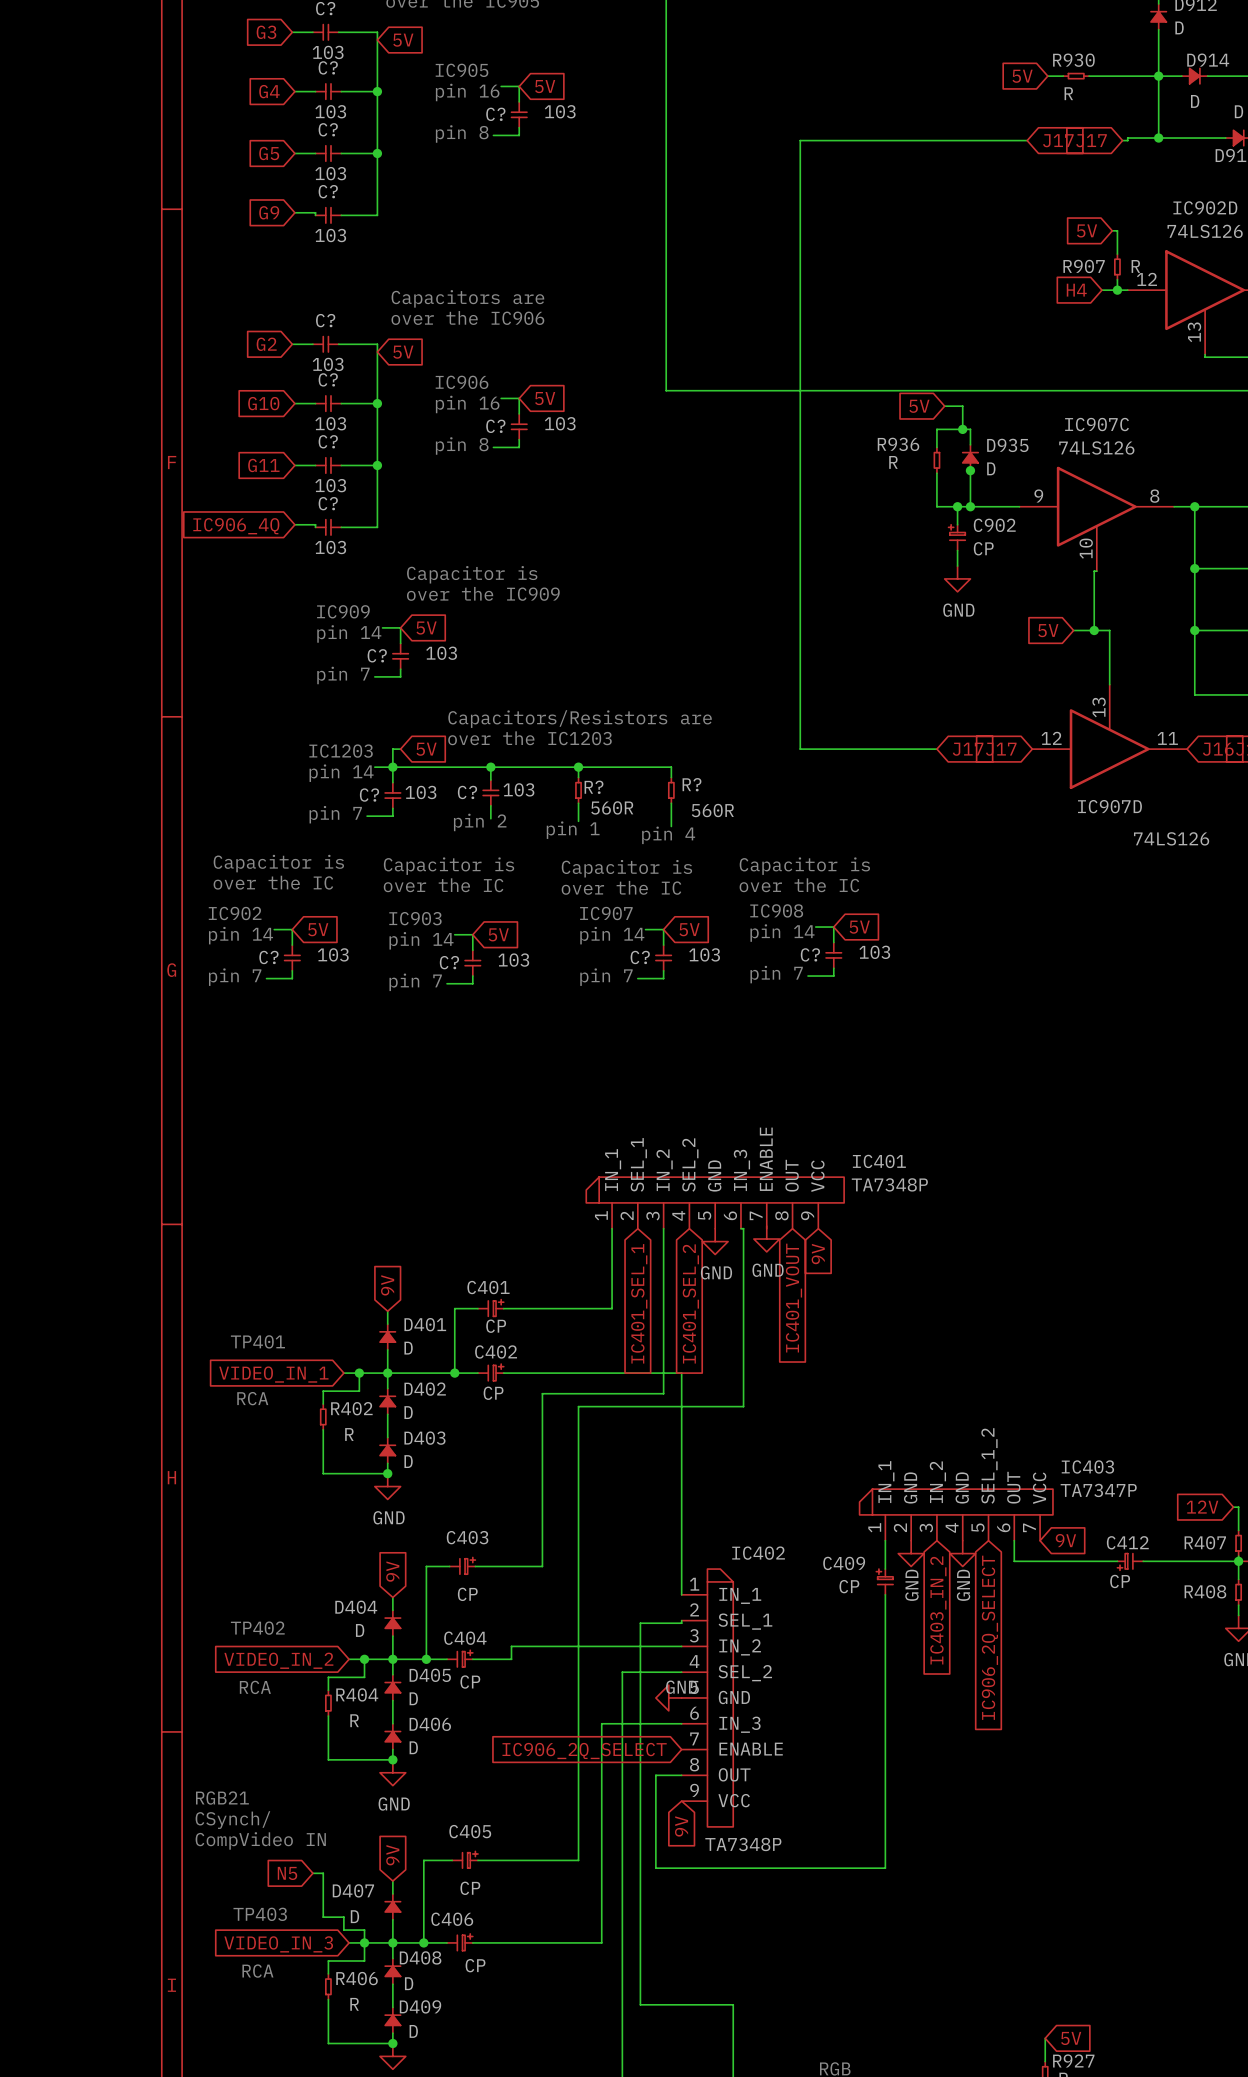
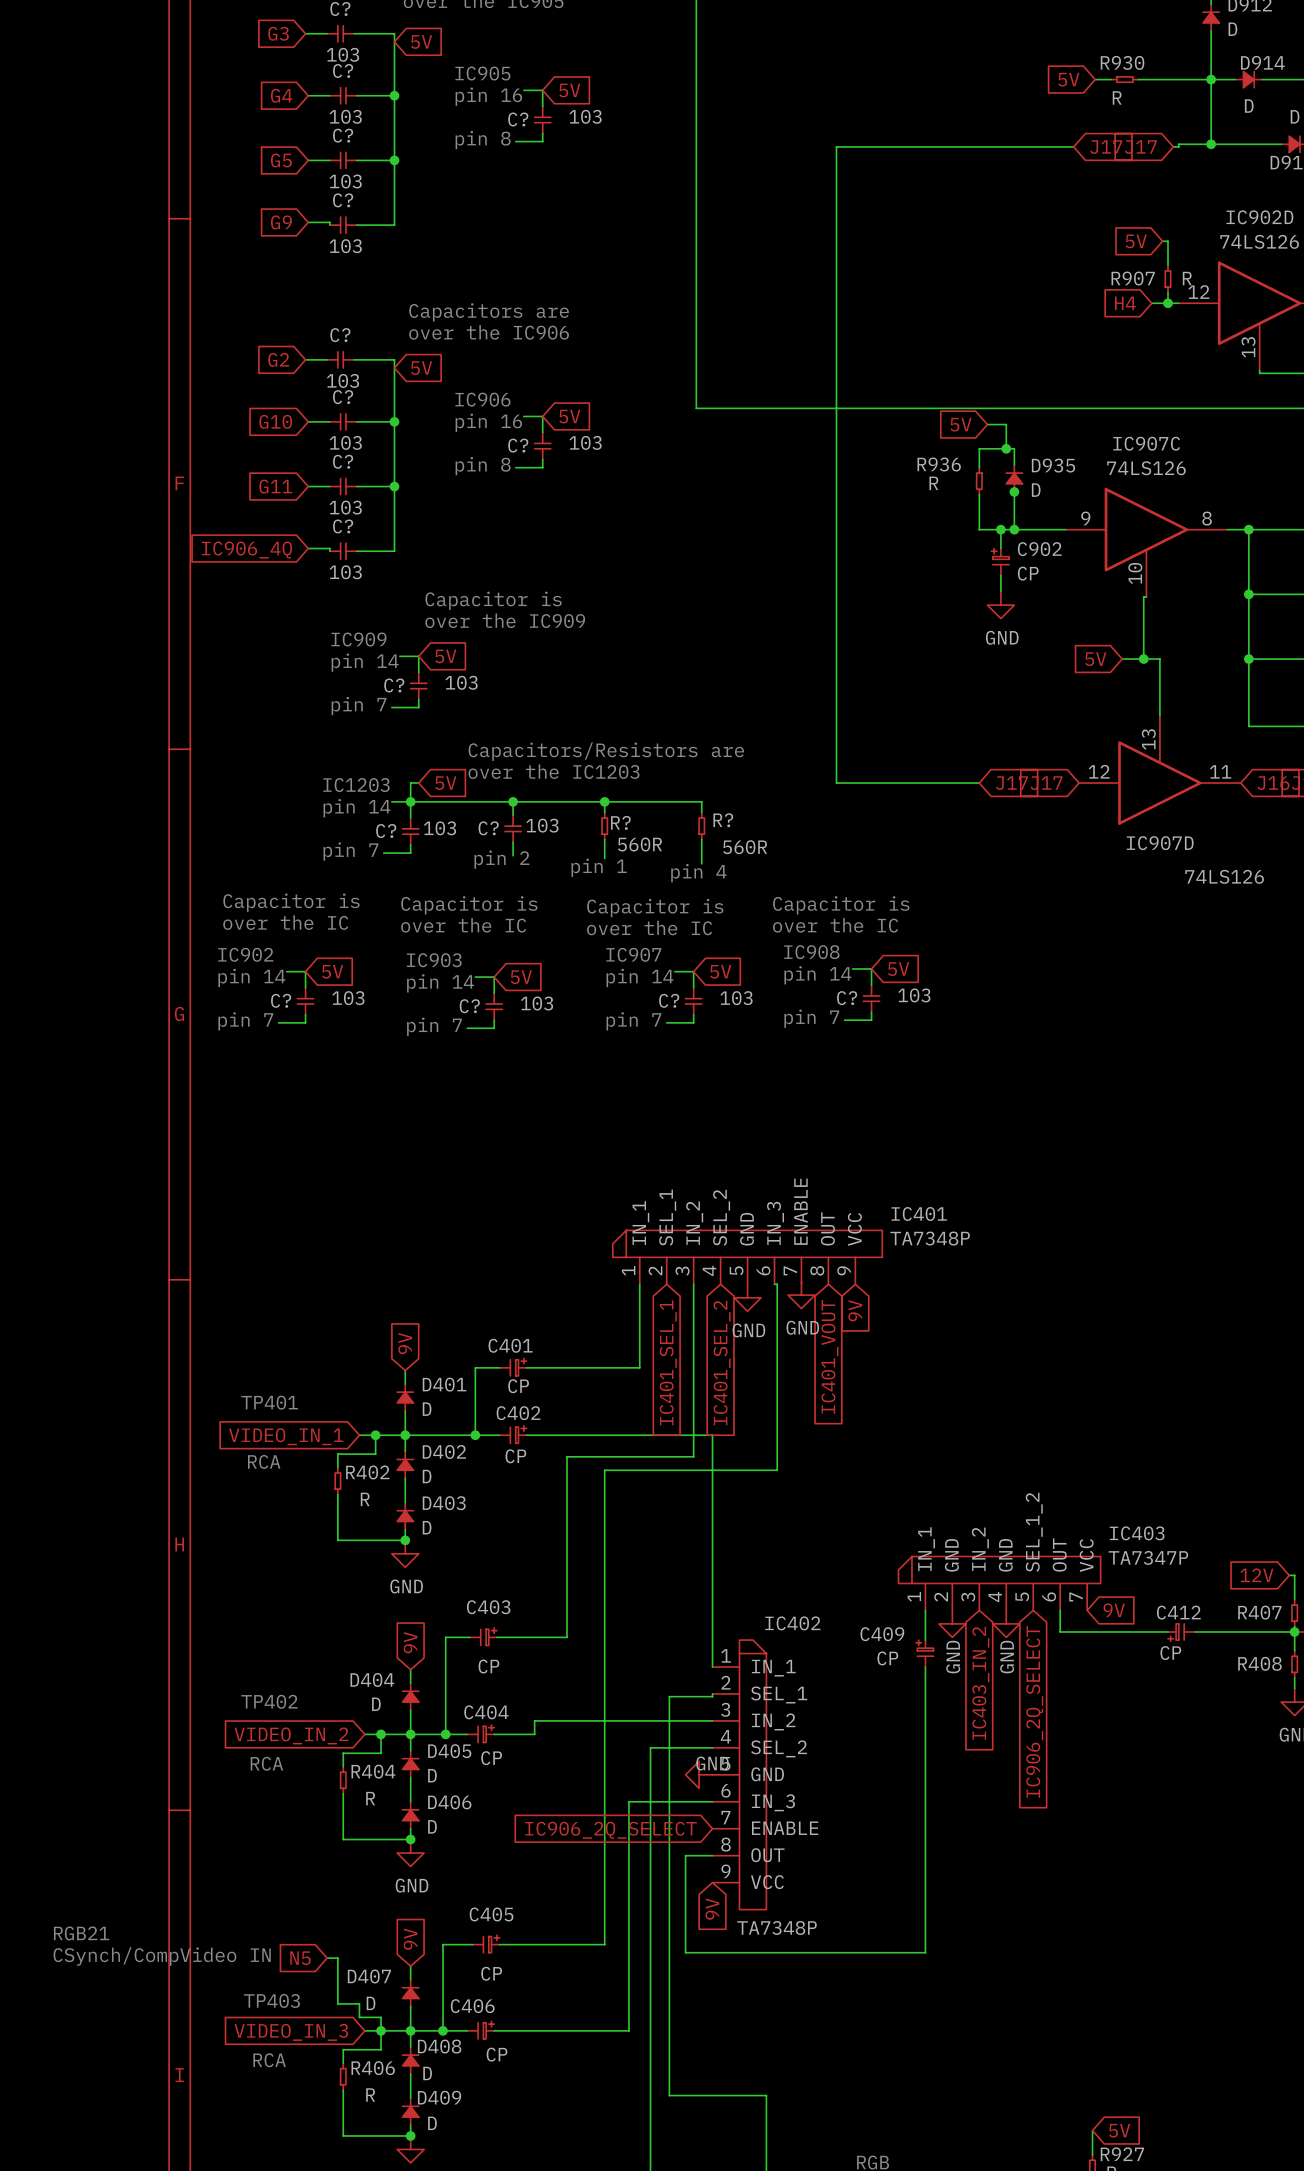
text position: RGB21 (222, 1798) -> RGB21 (81, 1933)
text: CSynch/ (232, 1820) -> none
text: CompVideo IN (260, 1840) -> none
text: none -> CSynch/CompVideo IN (162, 1956)

